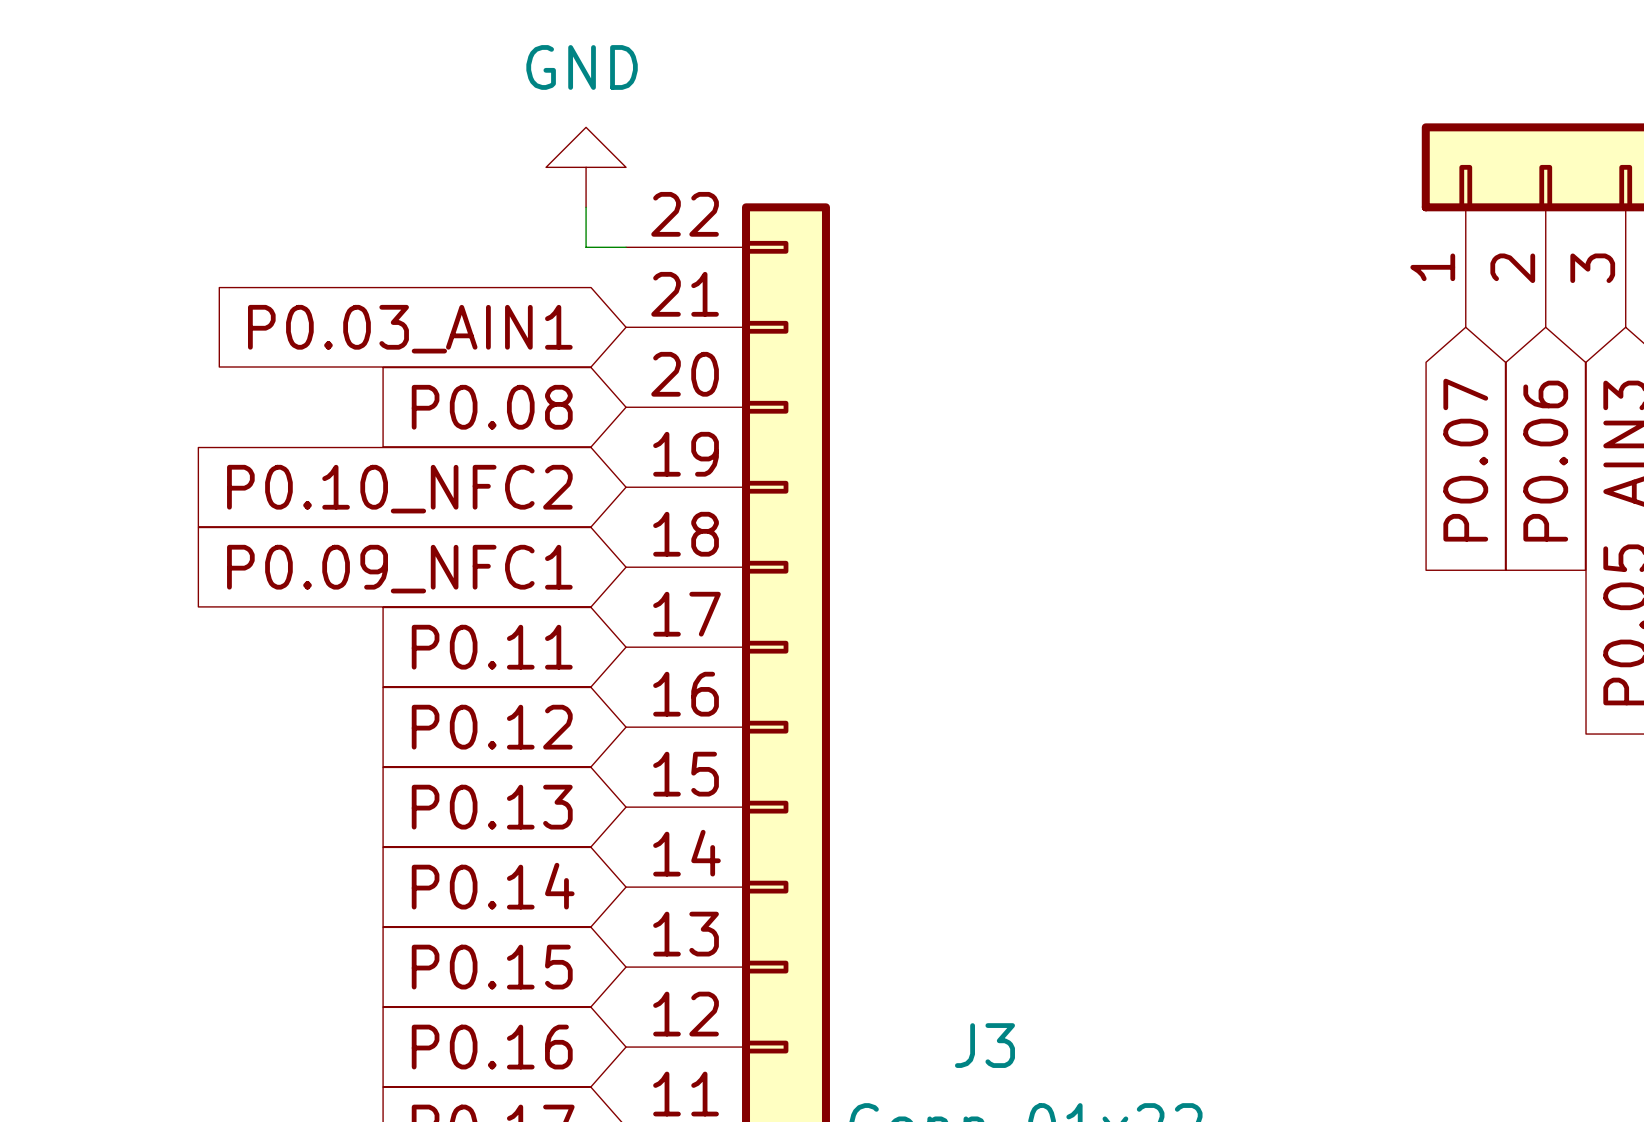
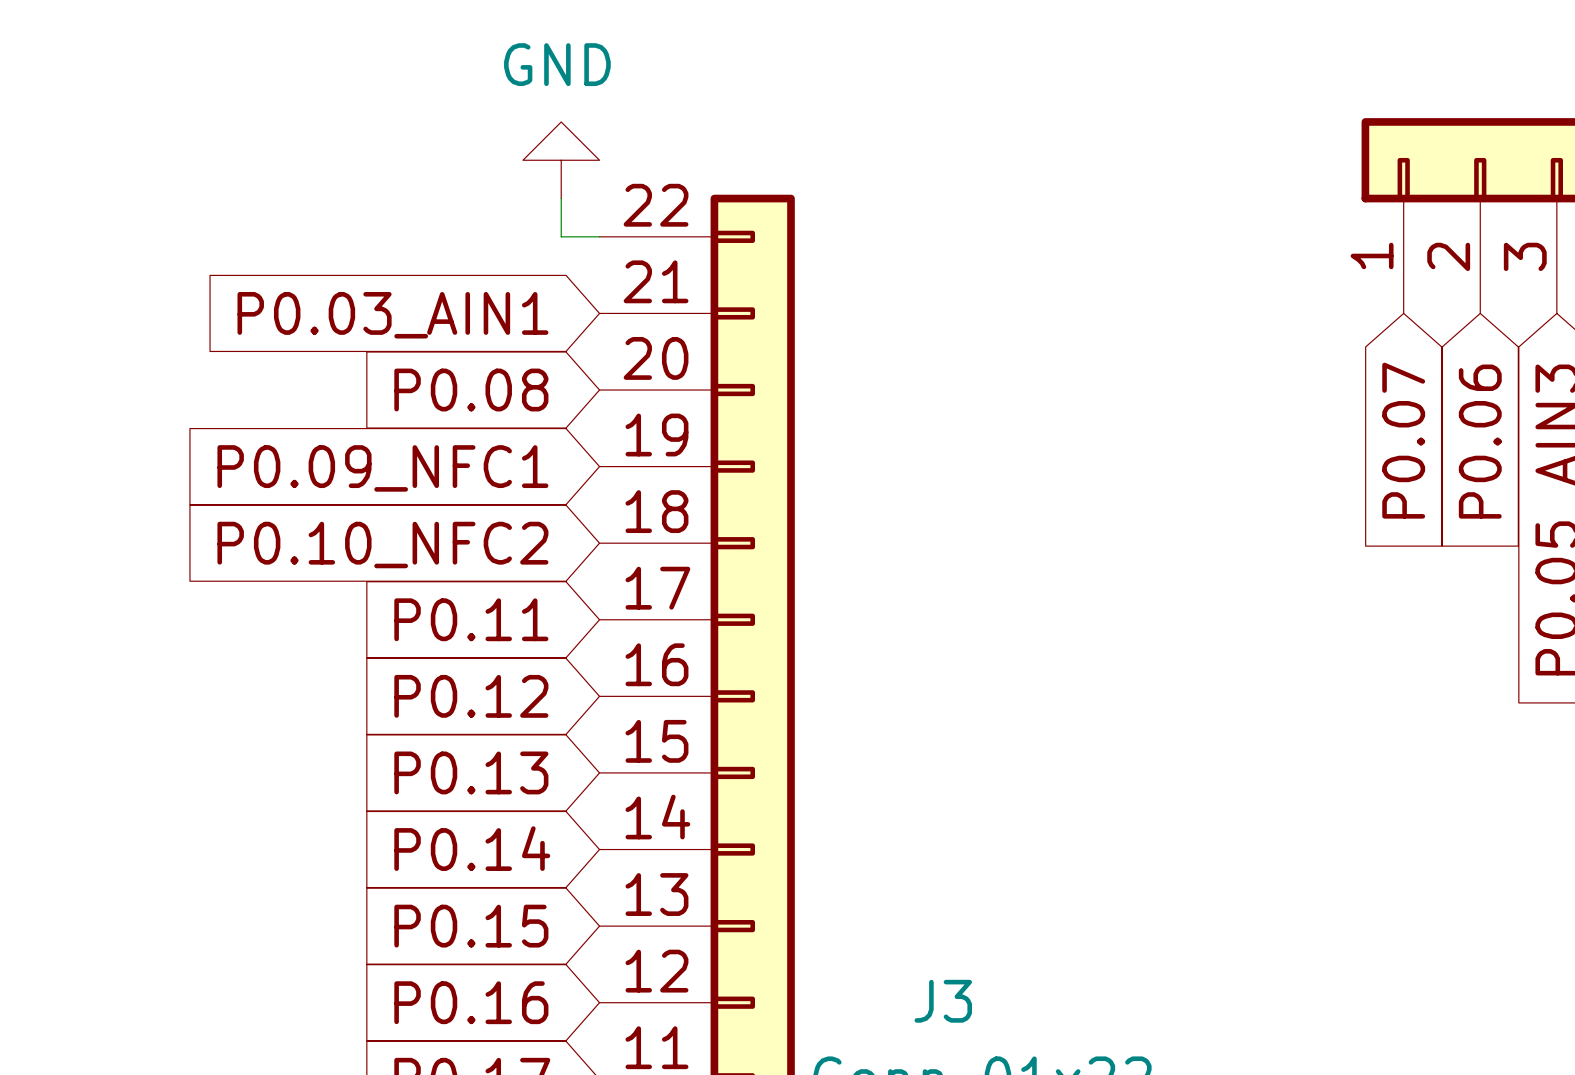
global label: P0.10_NFC2 (399, 489) -> P0.09_NFC1 (382, 468)
global label: P0.09_NFC1 (399, 569) -> P0.10_NFC2 (382, 545)

